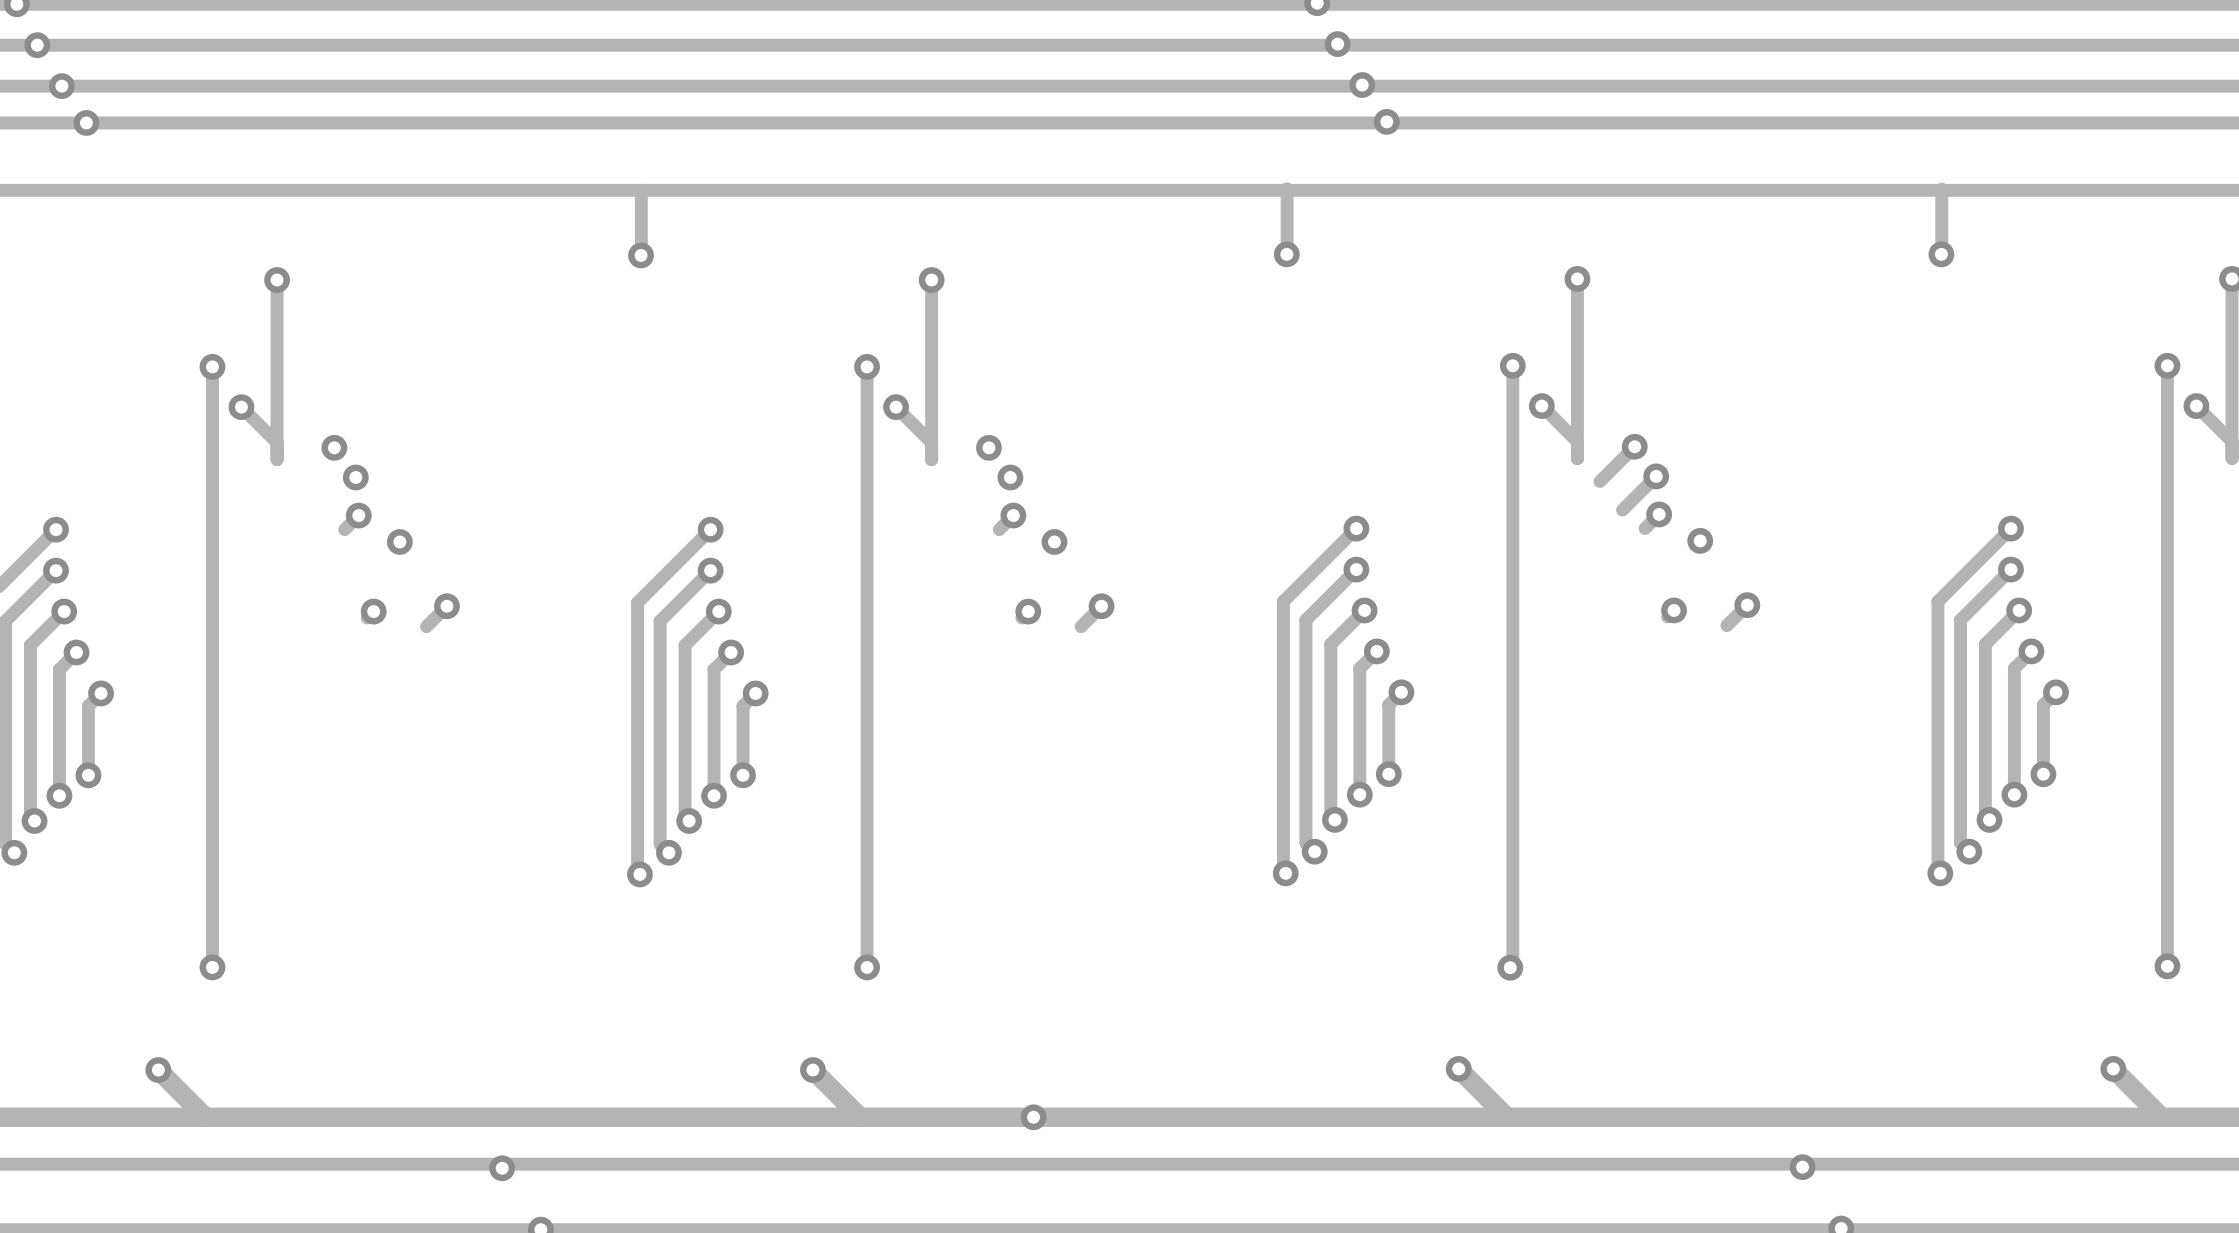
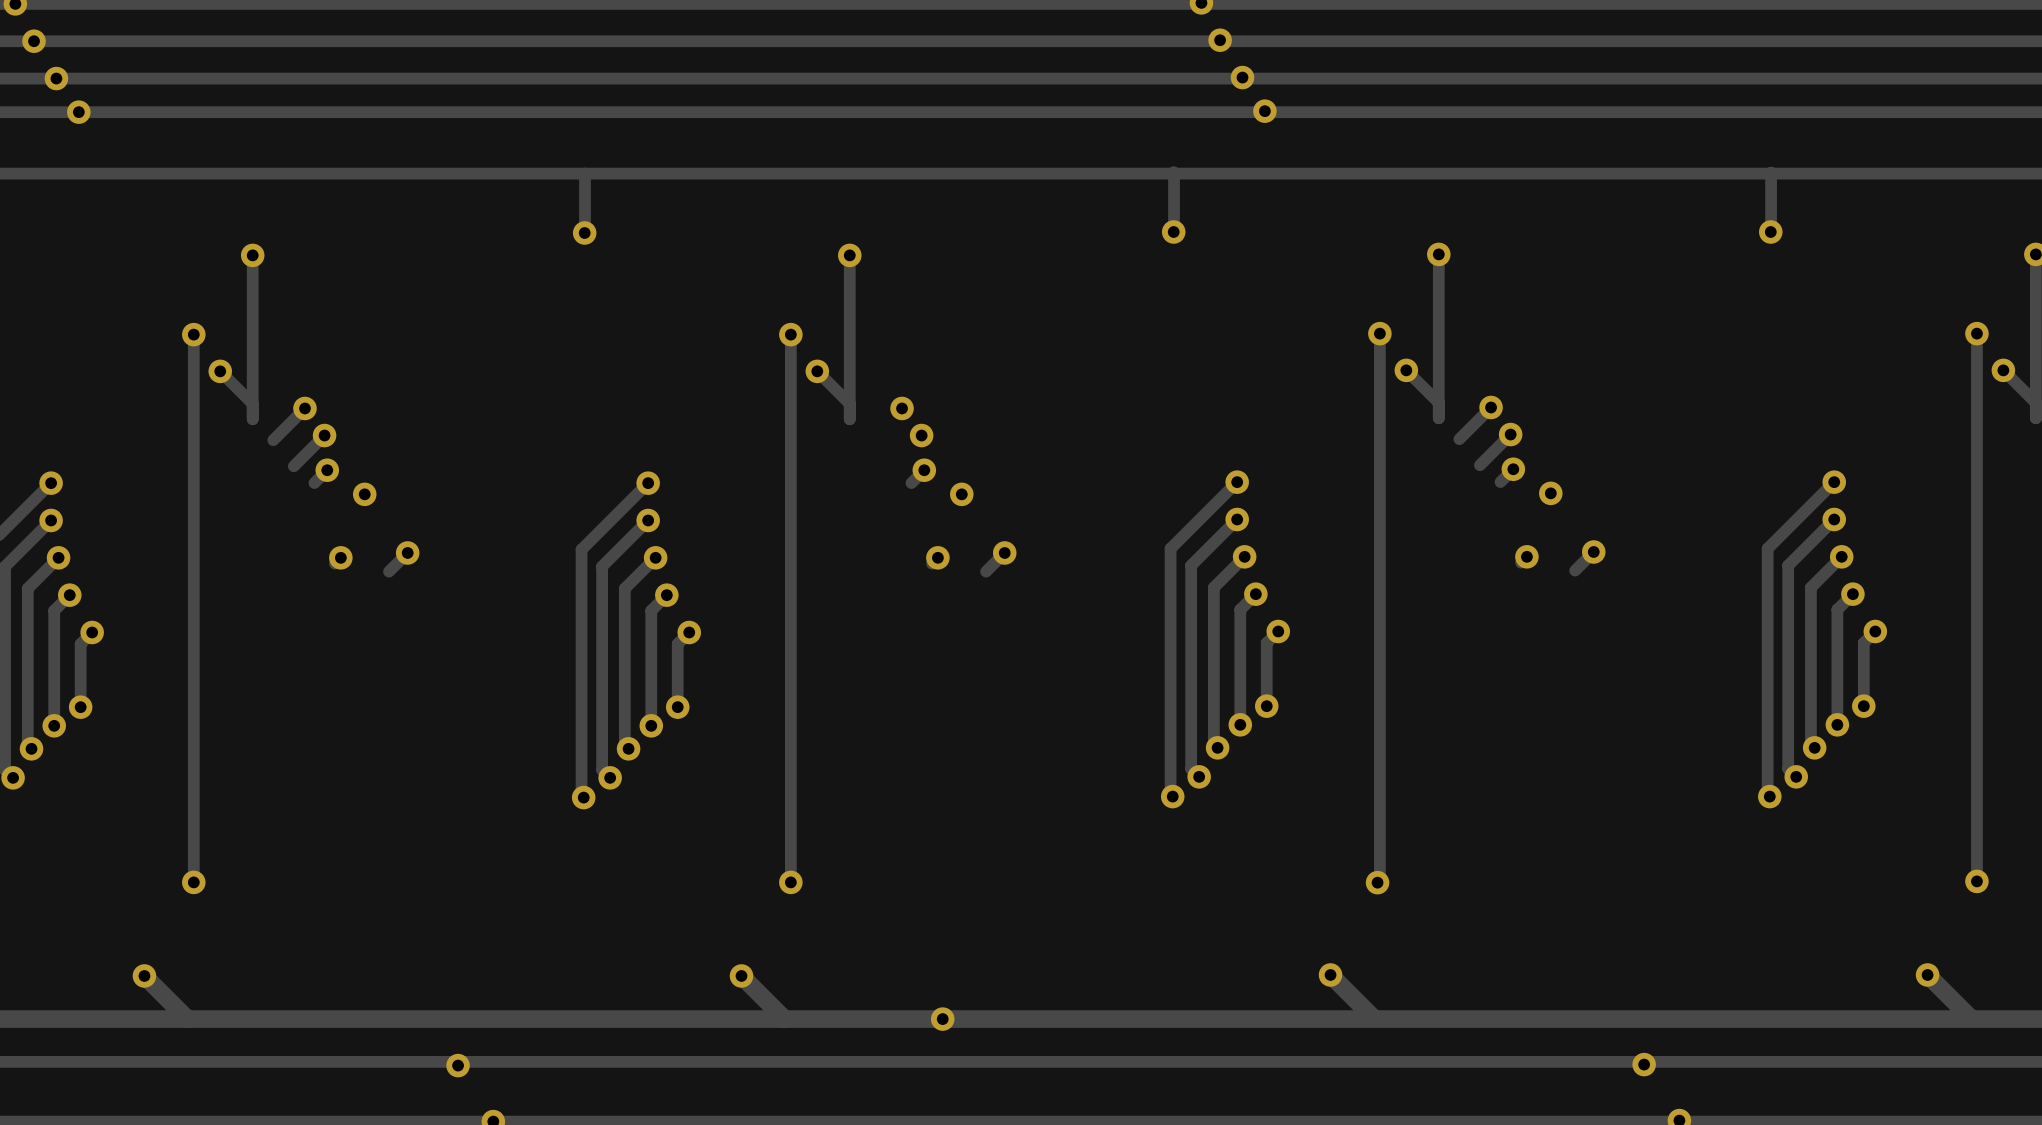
track: none -> (304, 408) (273, 440)
track: none -> (324, 435) (293, 466)

